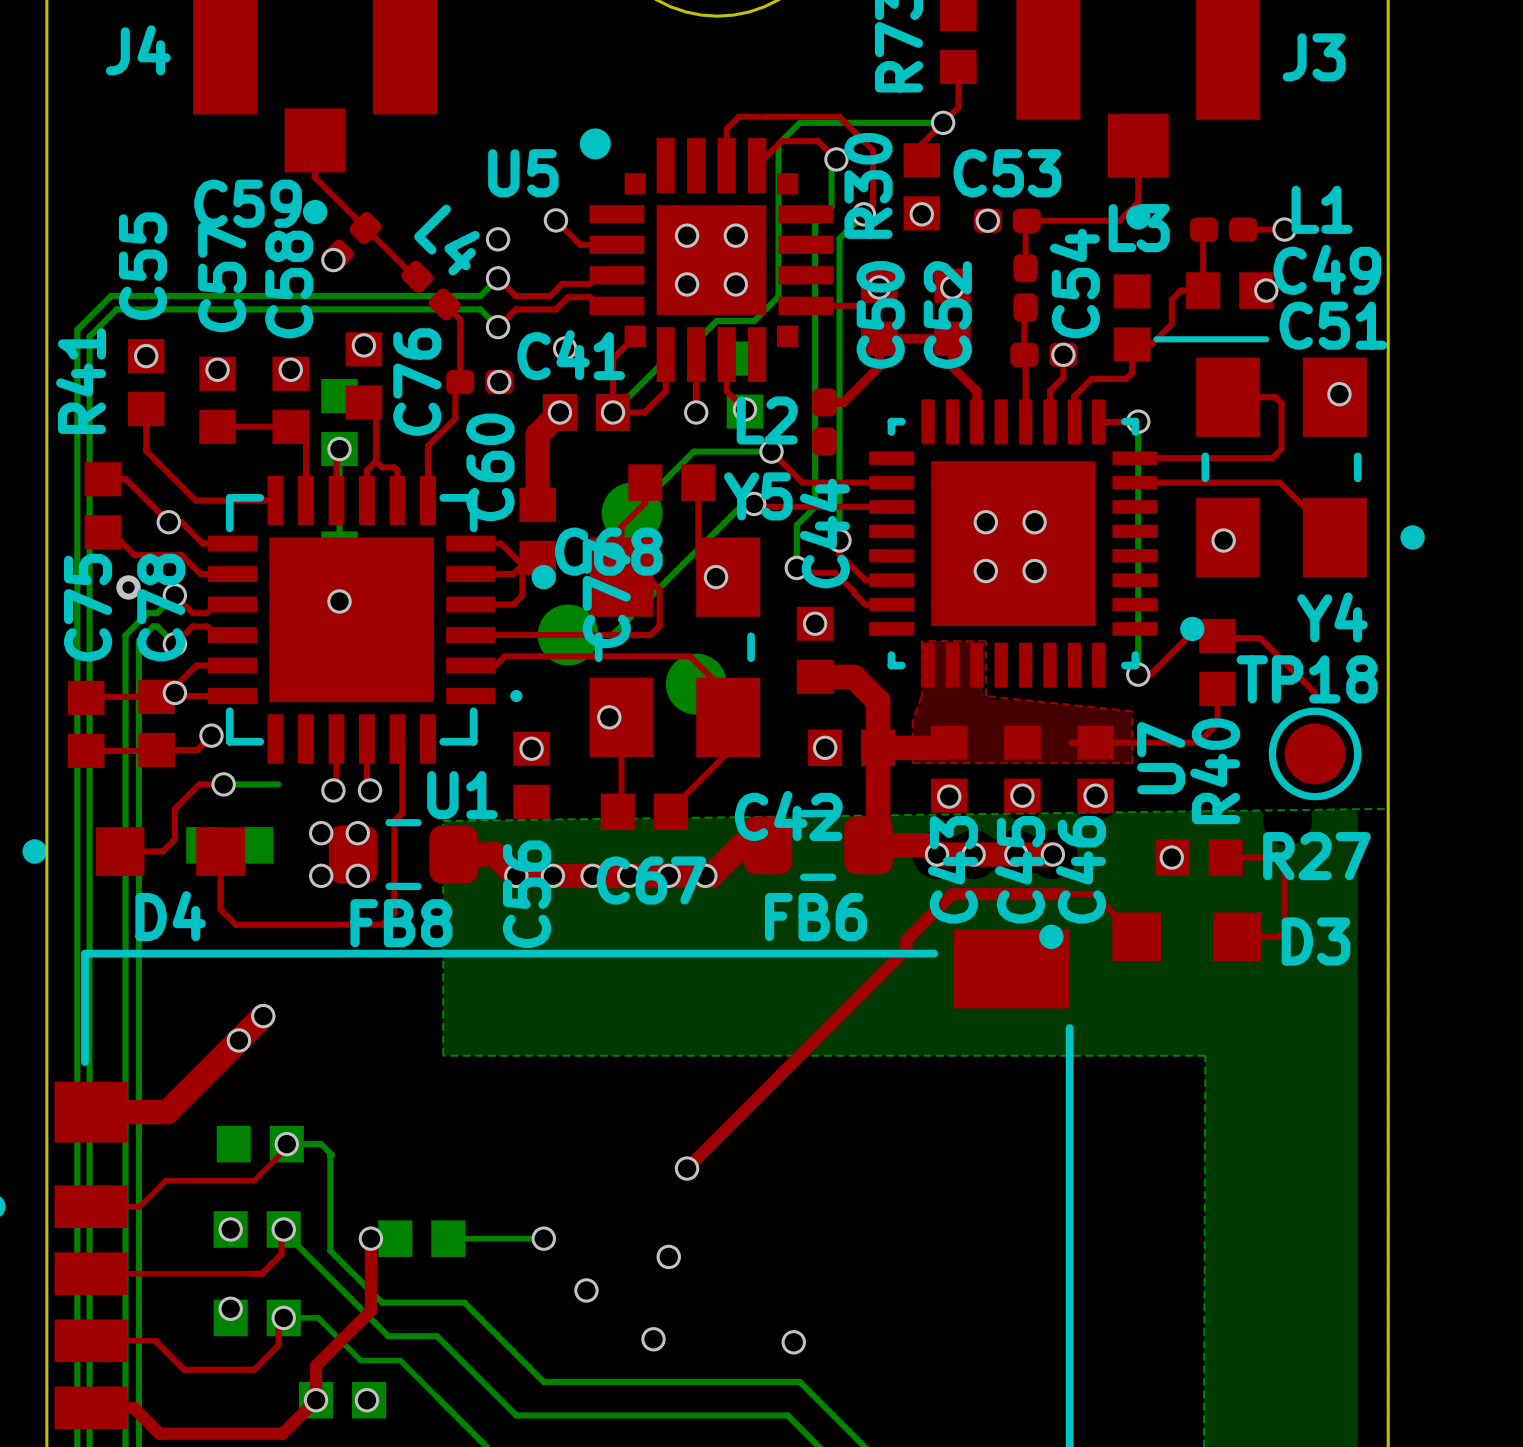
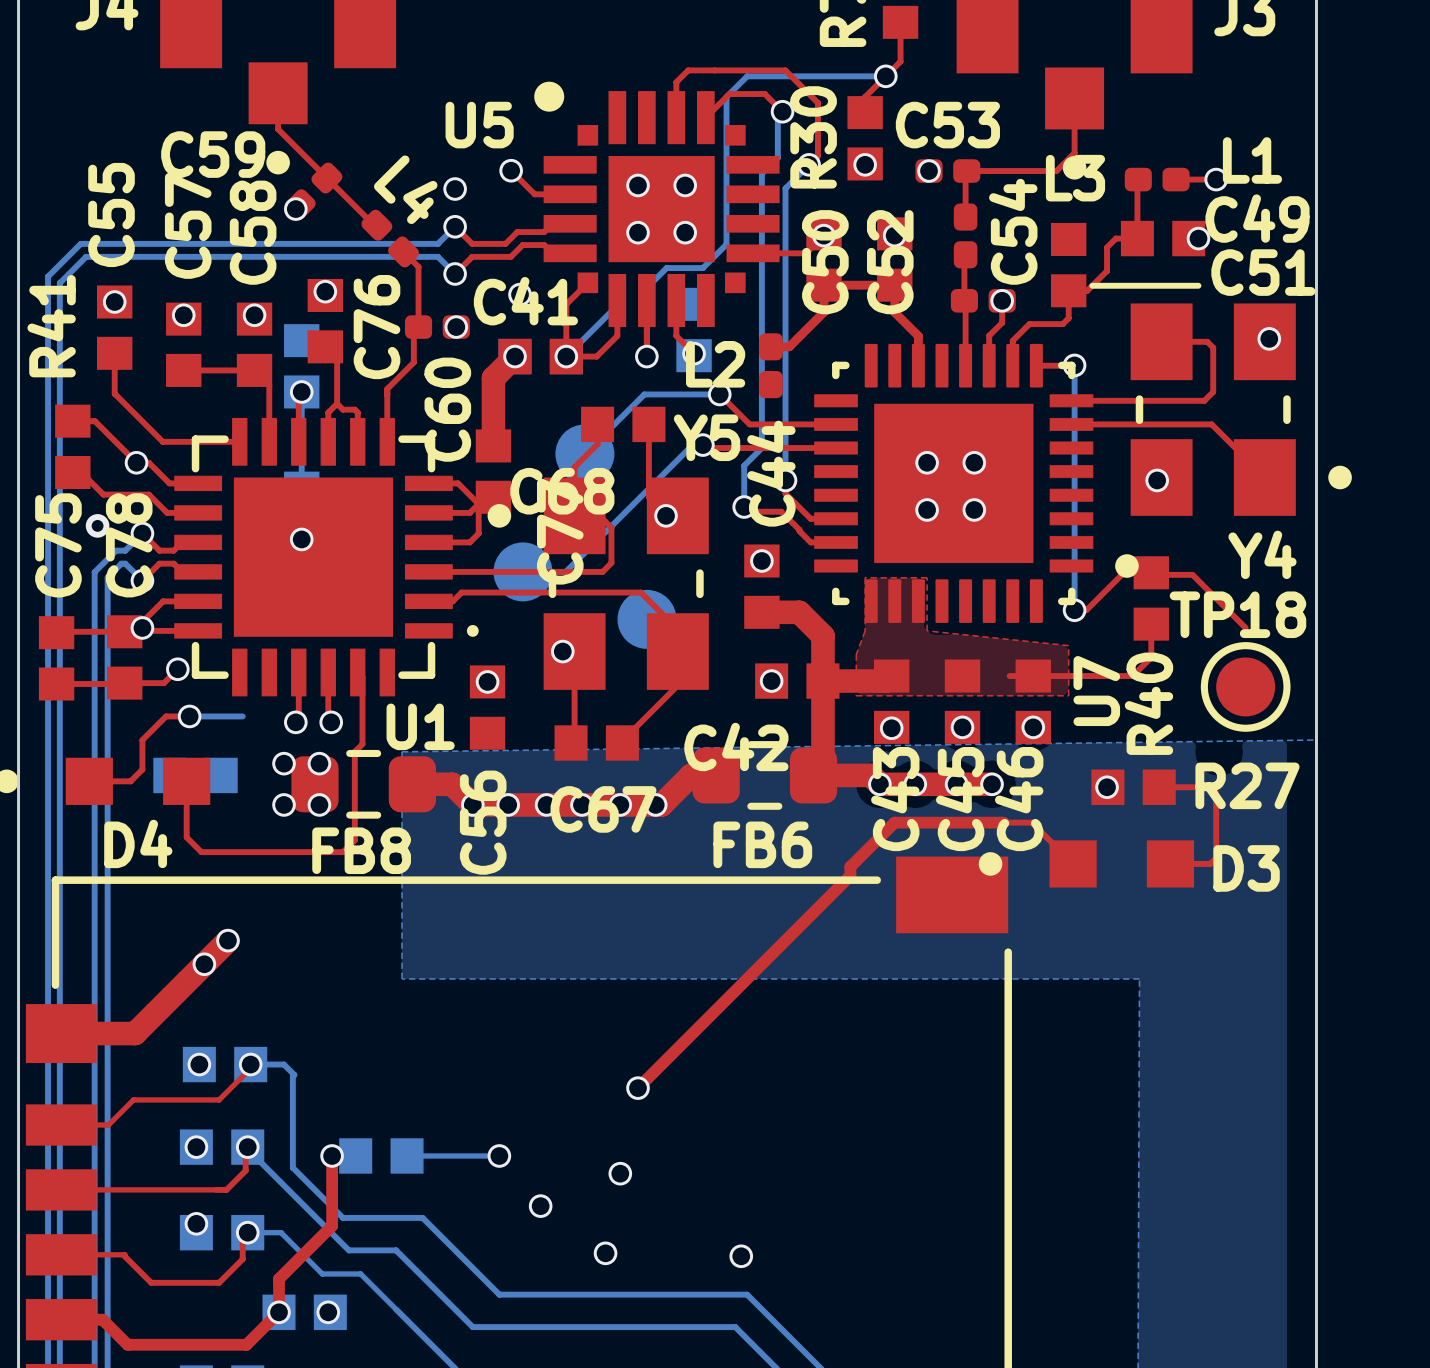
via: none -> (199, 1064)

